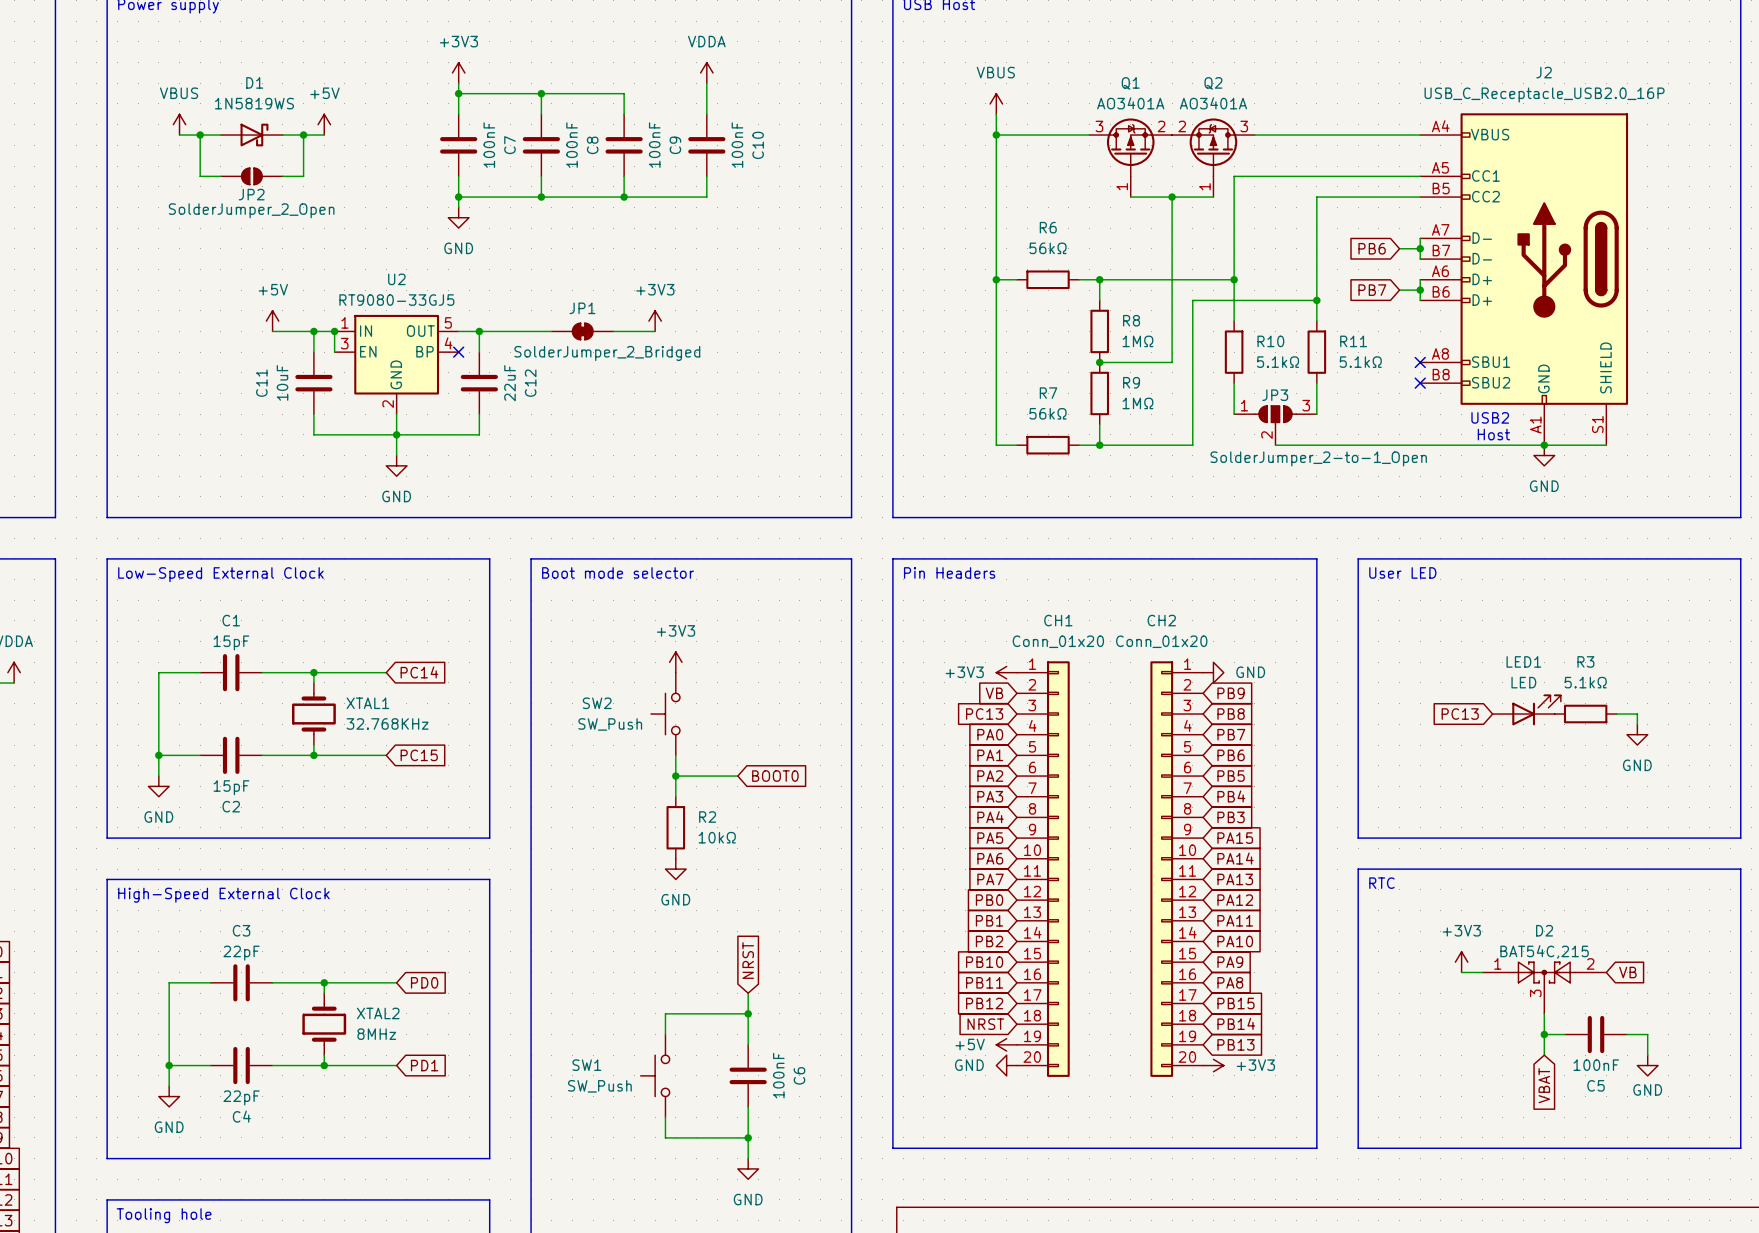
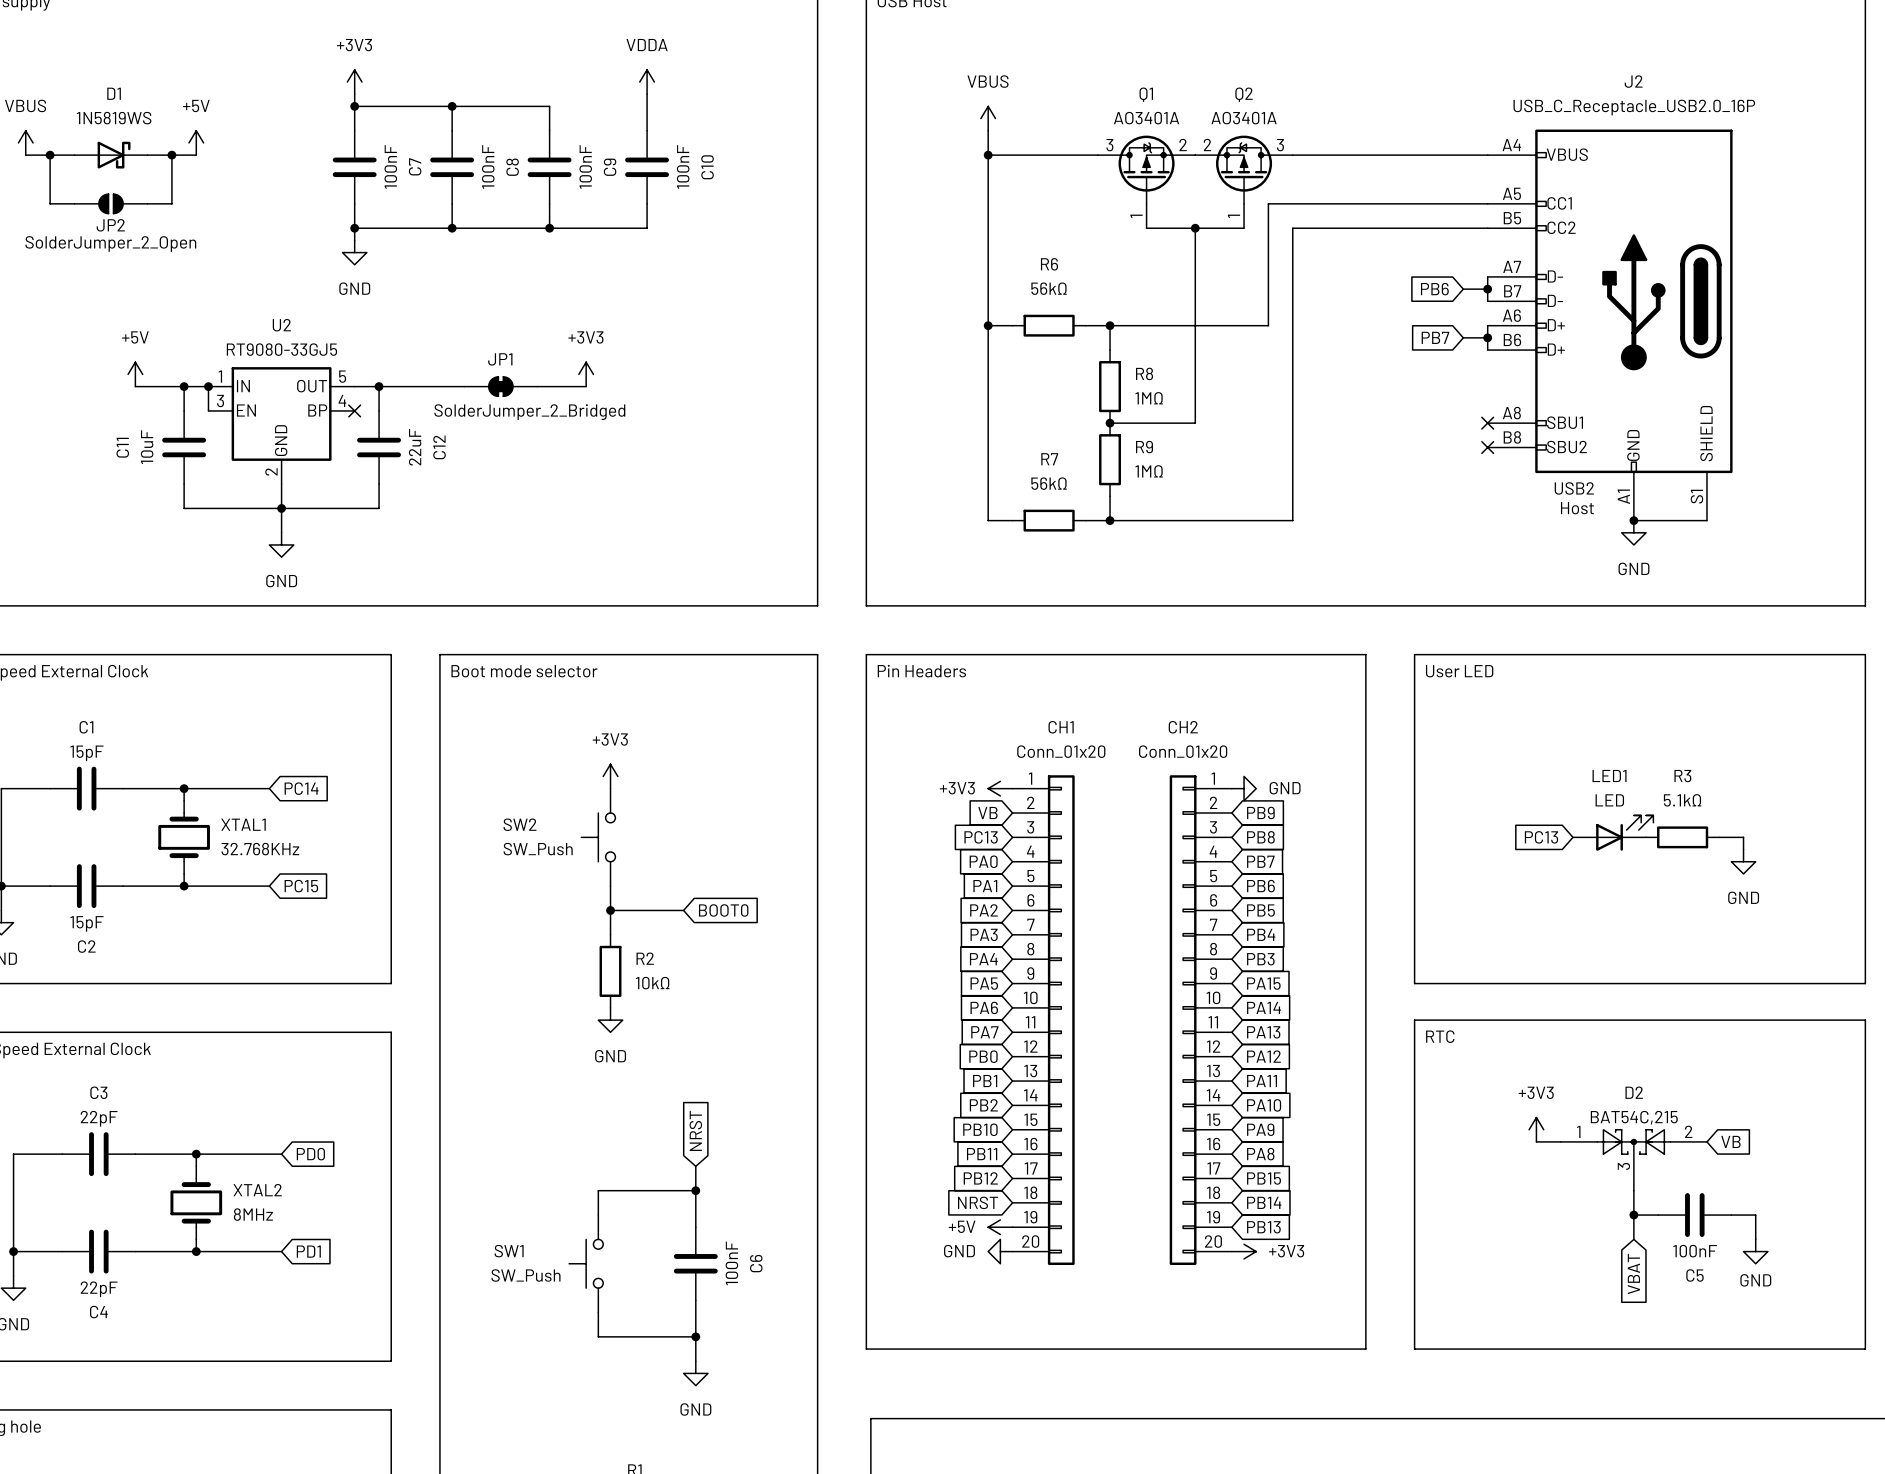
wire: (1316, 197) (1316, 321) -> none
wire: (1234, 279) (1234, 321) -> none
junction: (1234, 279) -> none
wire: (1316, 300) (1192, 300) (1192, 445) -> (1365, 228) (1292, 228) (1292, 520) (1219, 520)
junction: (1316, 300) -> none
R10: 5.1kΩ (1234, 352) -> none
R11: 5.1kΩ (1316, 352) -> none
wire: (1234, 383) (1234, 414) -> none
wire: (1316, 383) (1316, 414) -> none
JP3: SolderJumper_2-to-1_Open (1275, 425) -> none
wire: (1275, 445) (1544, 445) -> none

